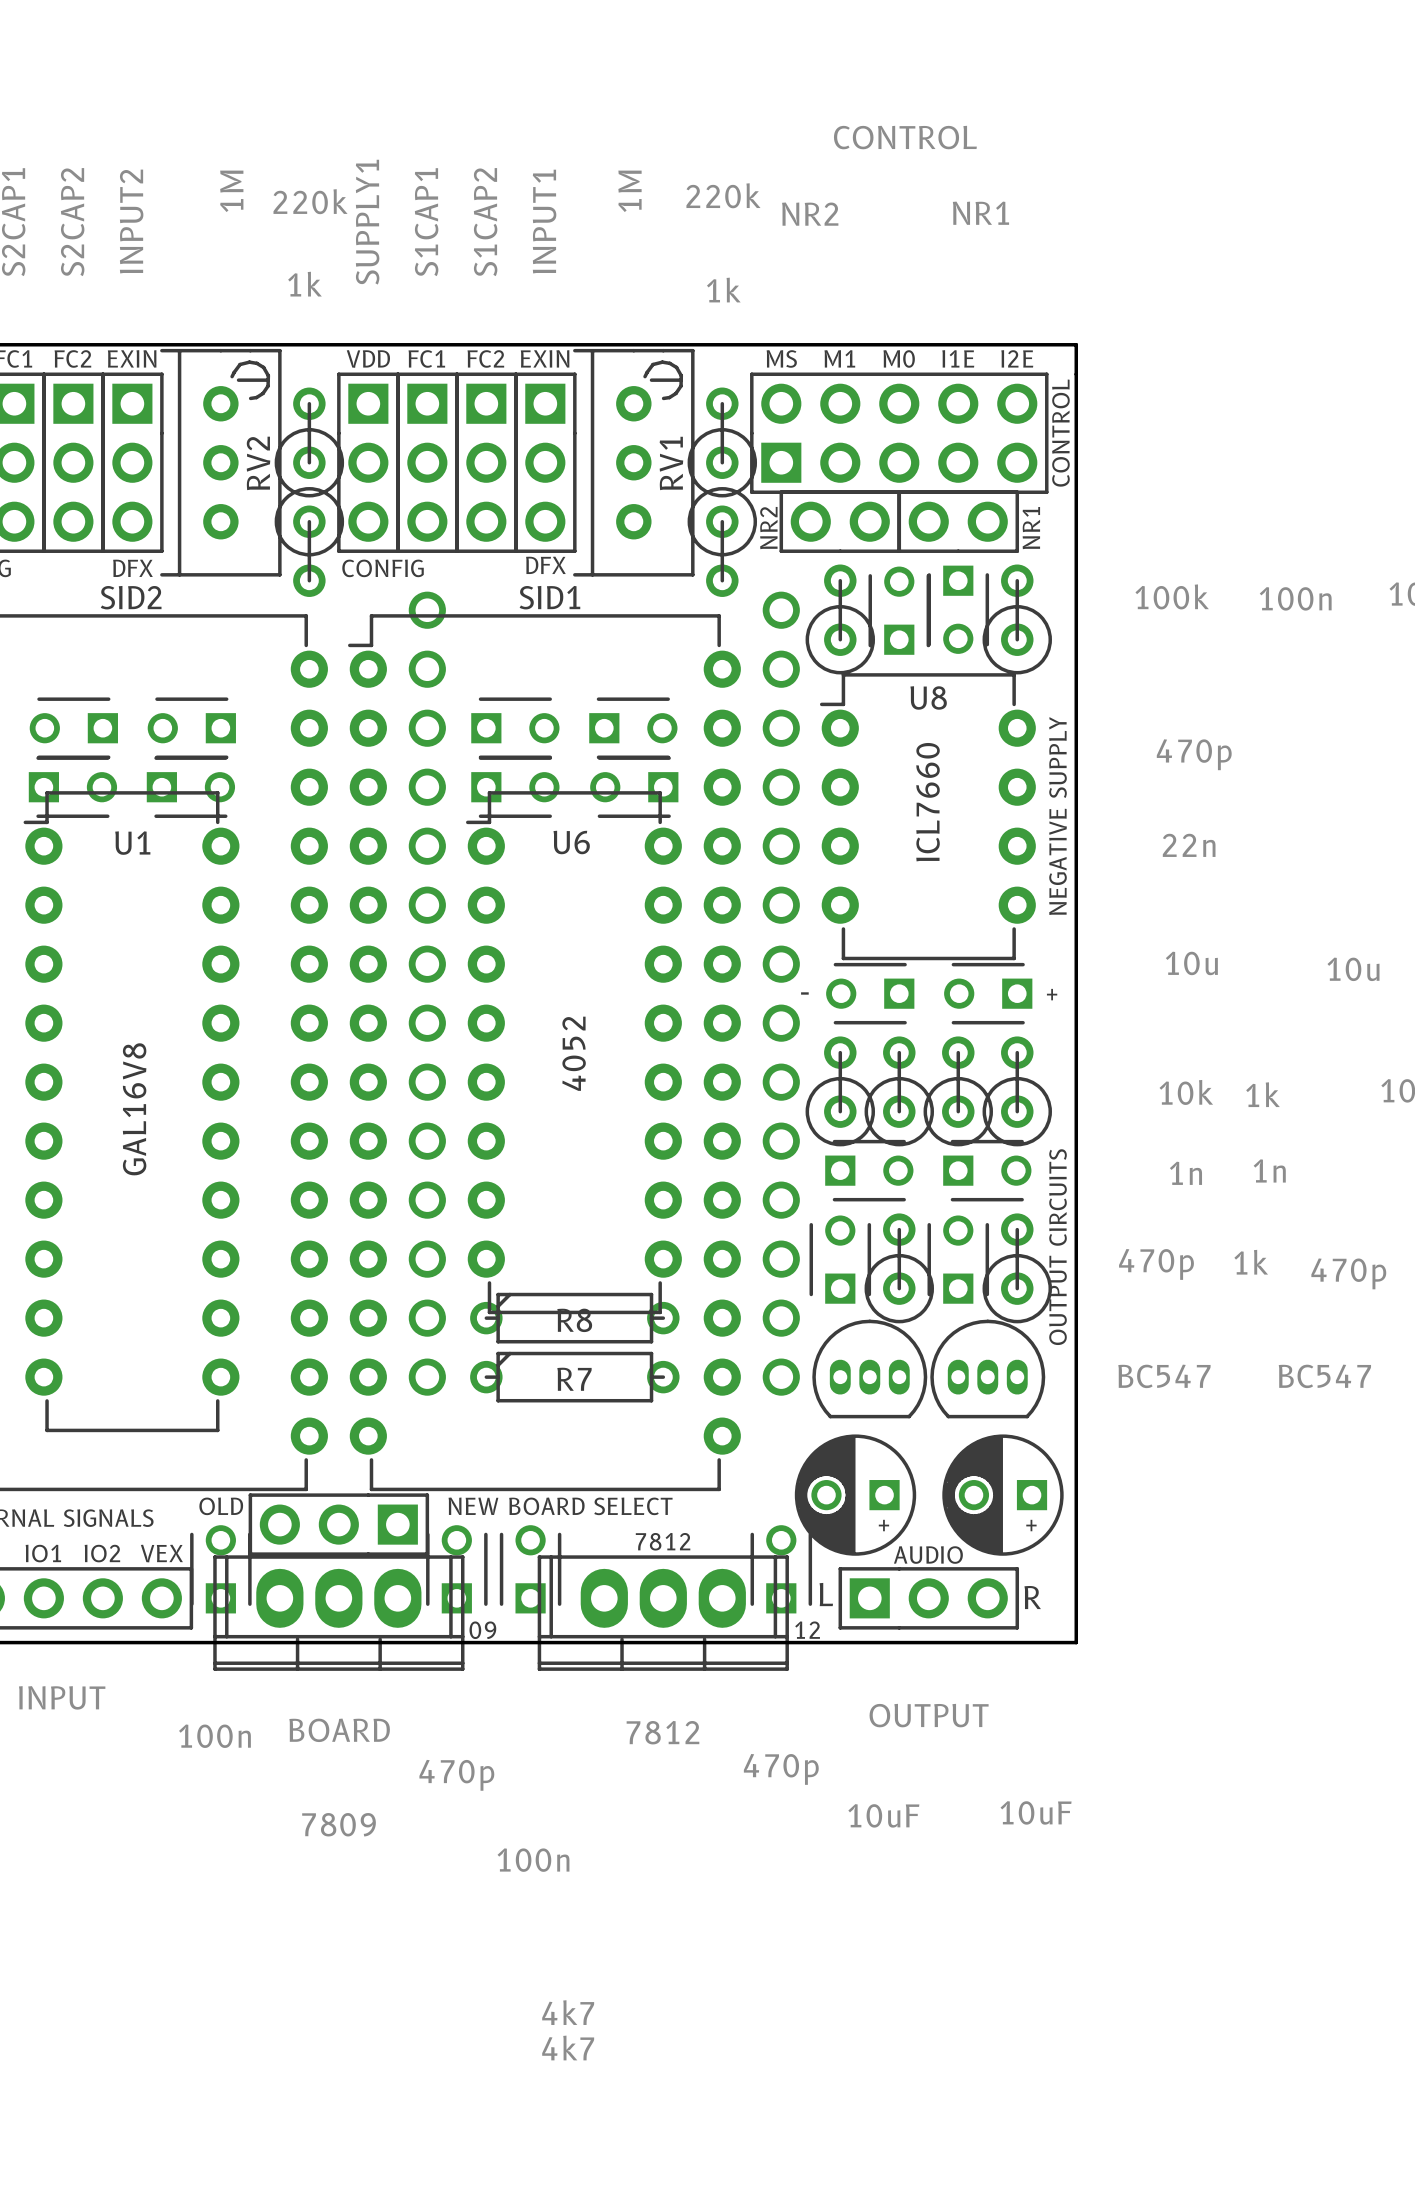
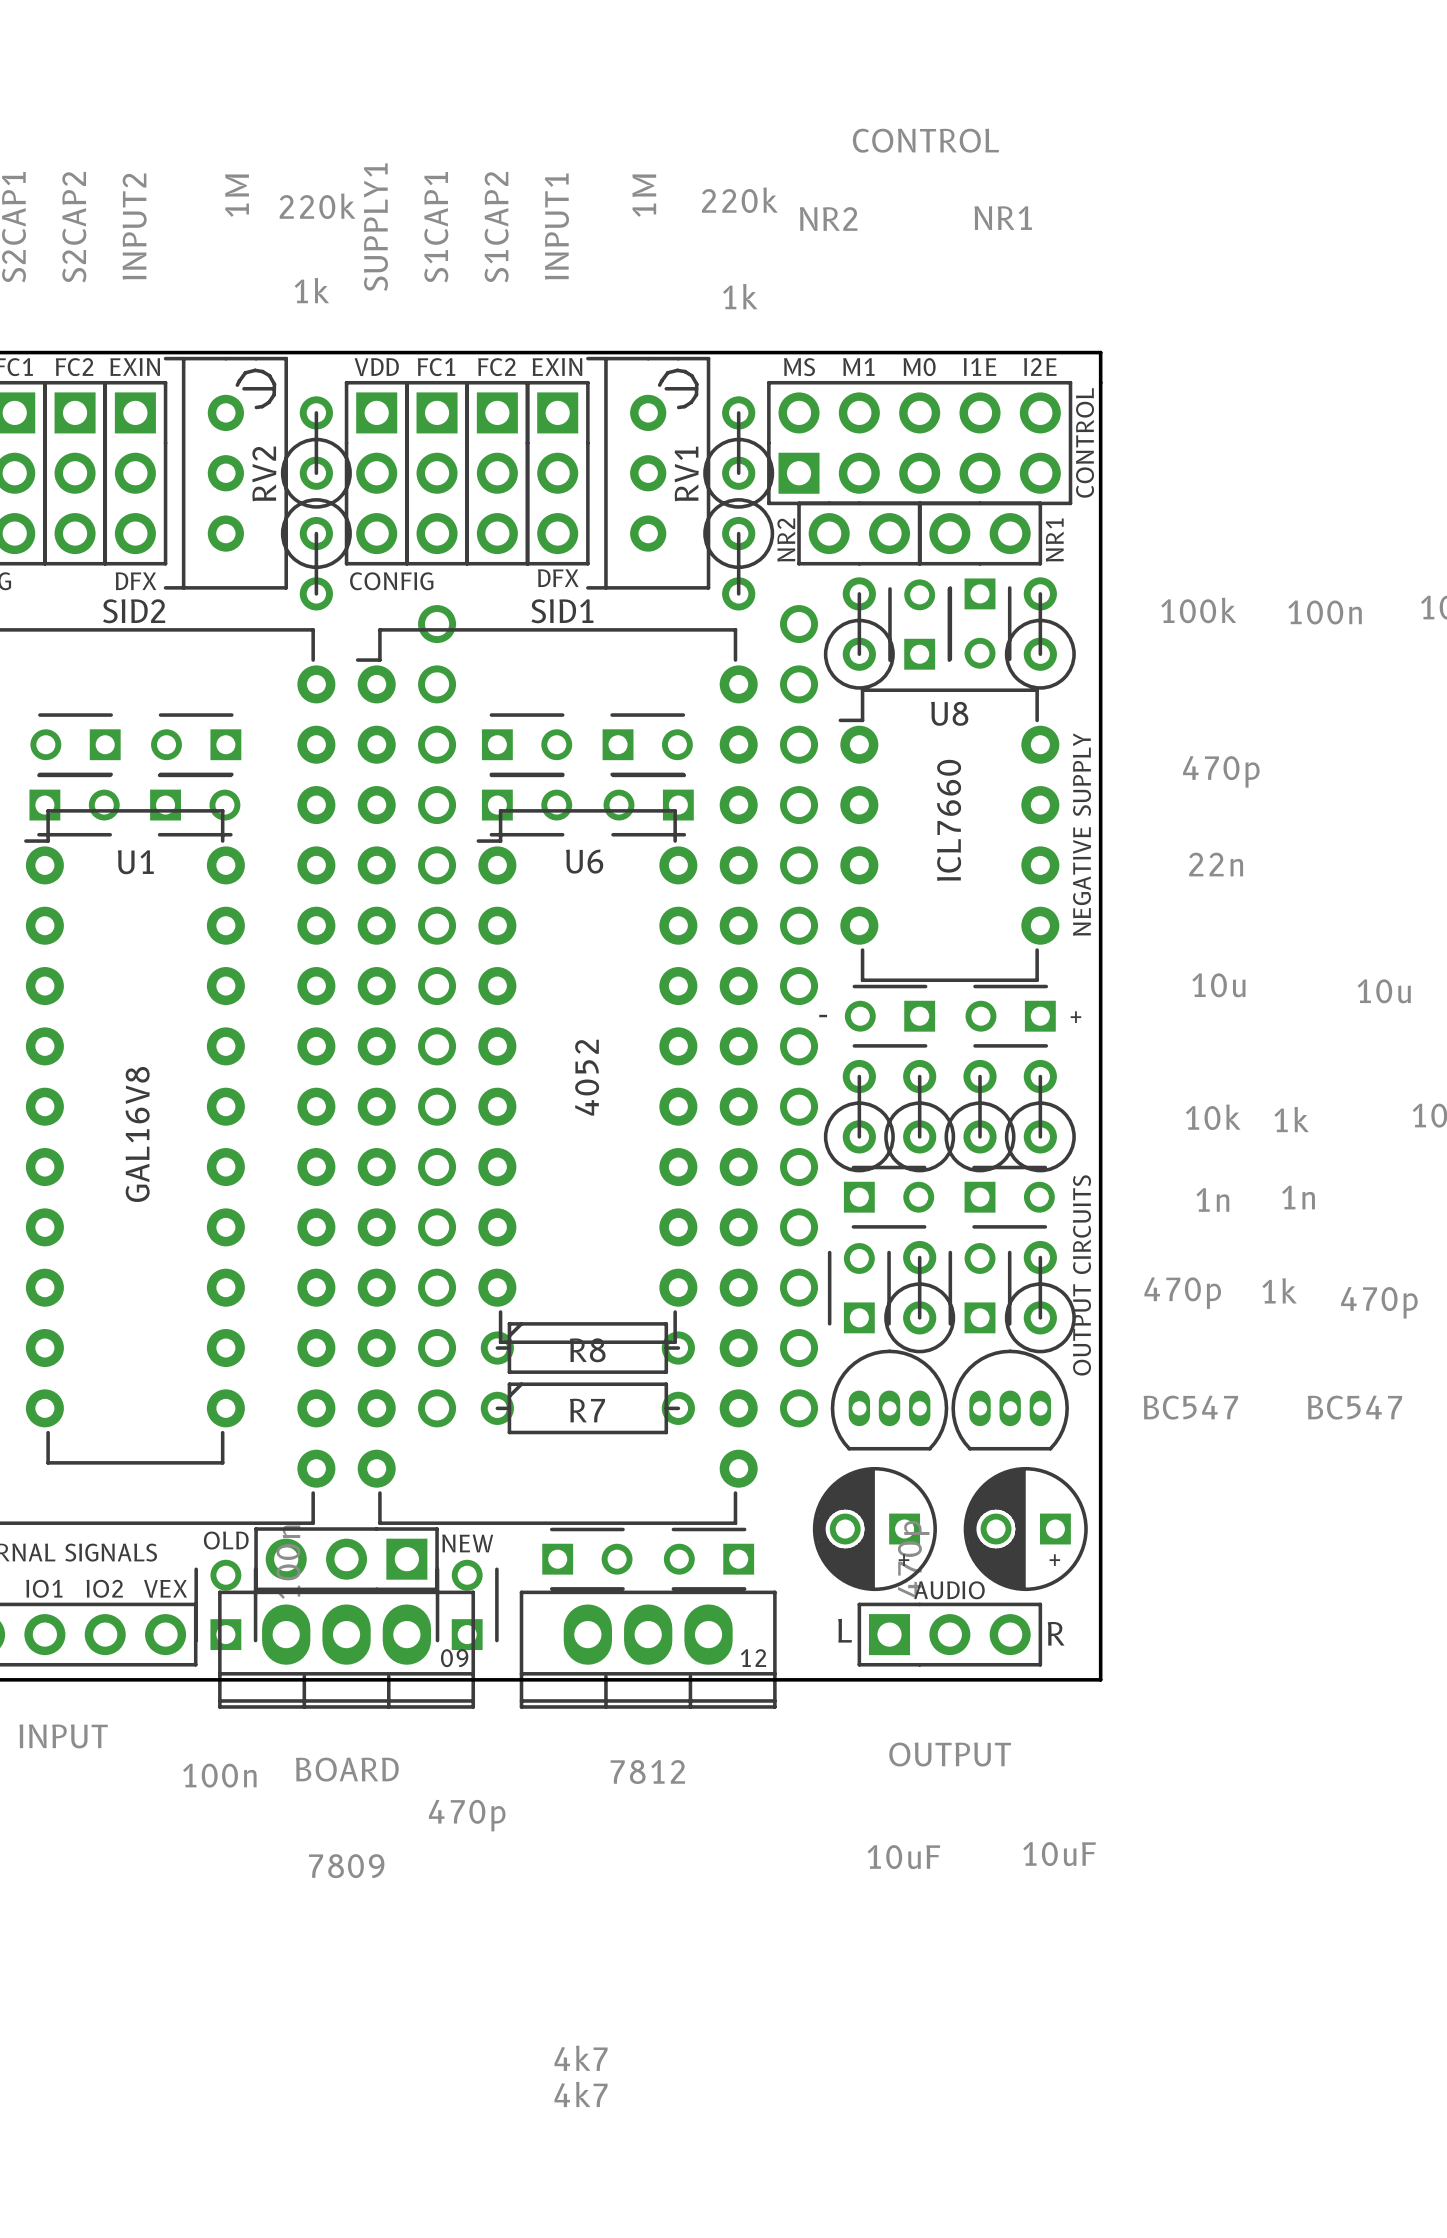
text: NEW BOARD SELECT (560, 1506) -> none
text: none -> NEW (467, 1543)
text: 7812 (663, 1541) -> none
part footprint: [213, 1555, 465, 1671] -> [218, 1590, 476, 1709]
part rotation: 0° (530, 1569) -> 90° clockwise (587, 1559)
part position: (530, 1569) -> (587, 1559)
part rotation: 0° (781, 1569) -> 90° counterclockwise (709, 1559)
part position: (781, 1569) -> (709, 1559)
part: none -> 7812 (648, 1649)
part: 7812 (663, 1613) -> none
text position: 09 (482, 1630) -> 09 (454, 1658)
text position: 12 (807, 1630) -> 12 (753, 1658)

